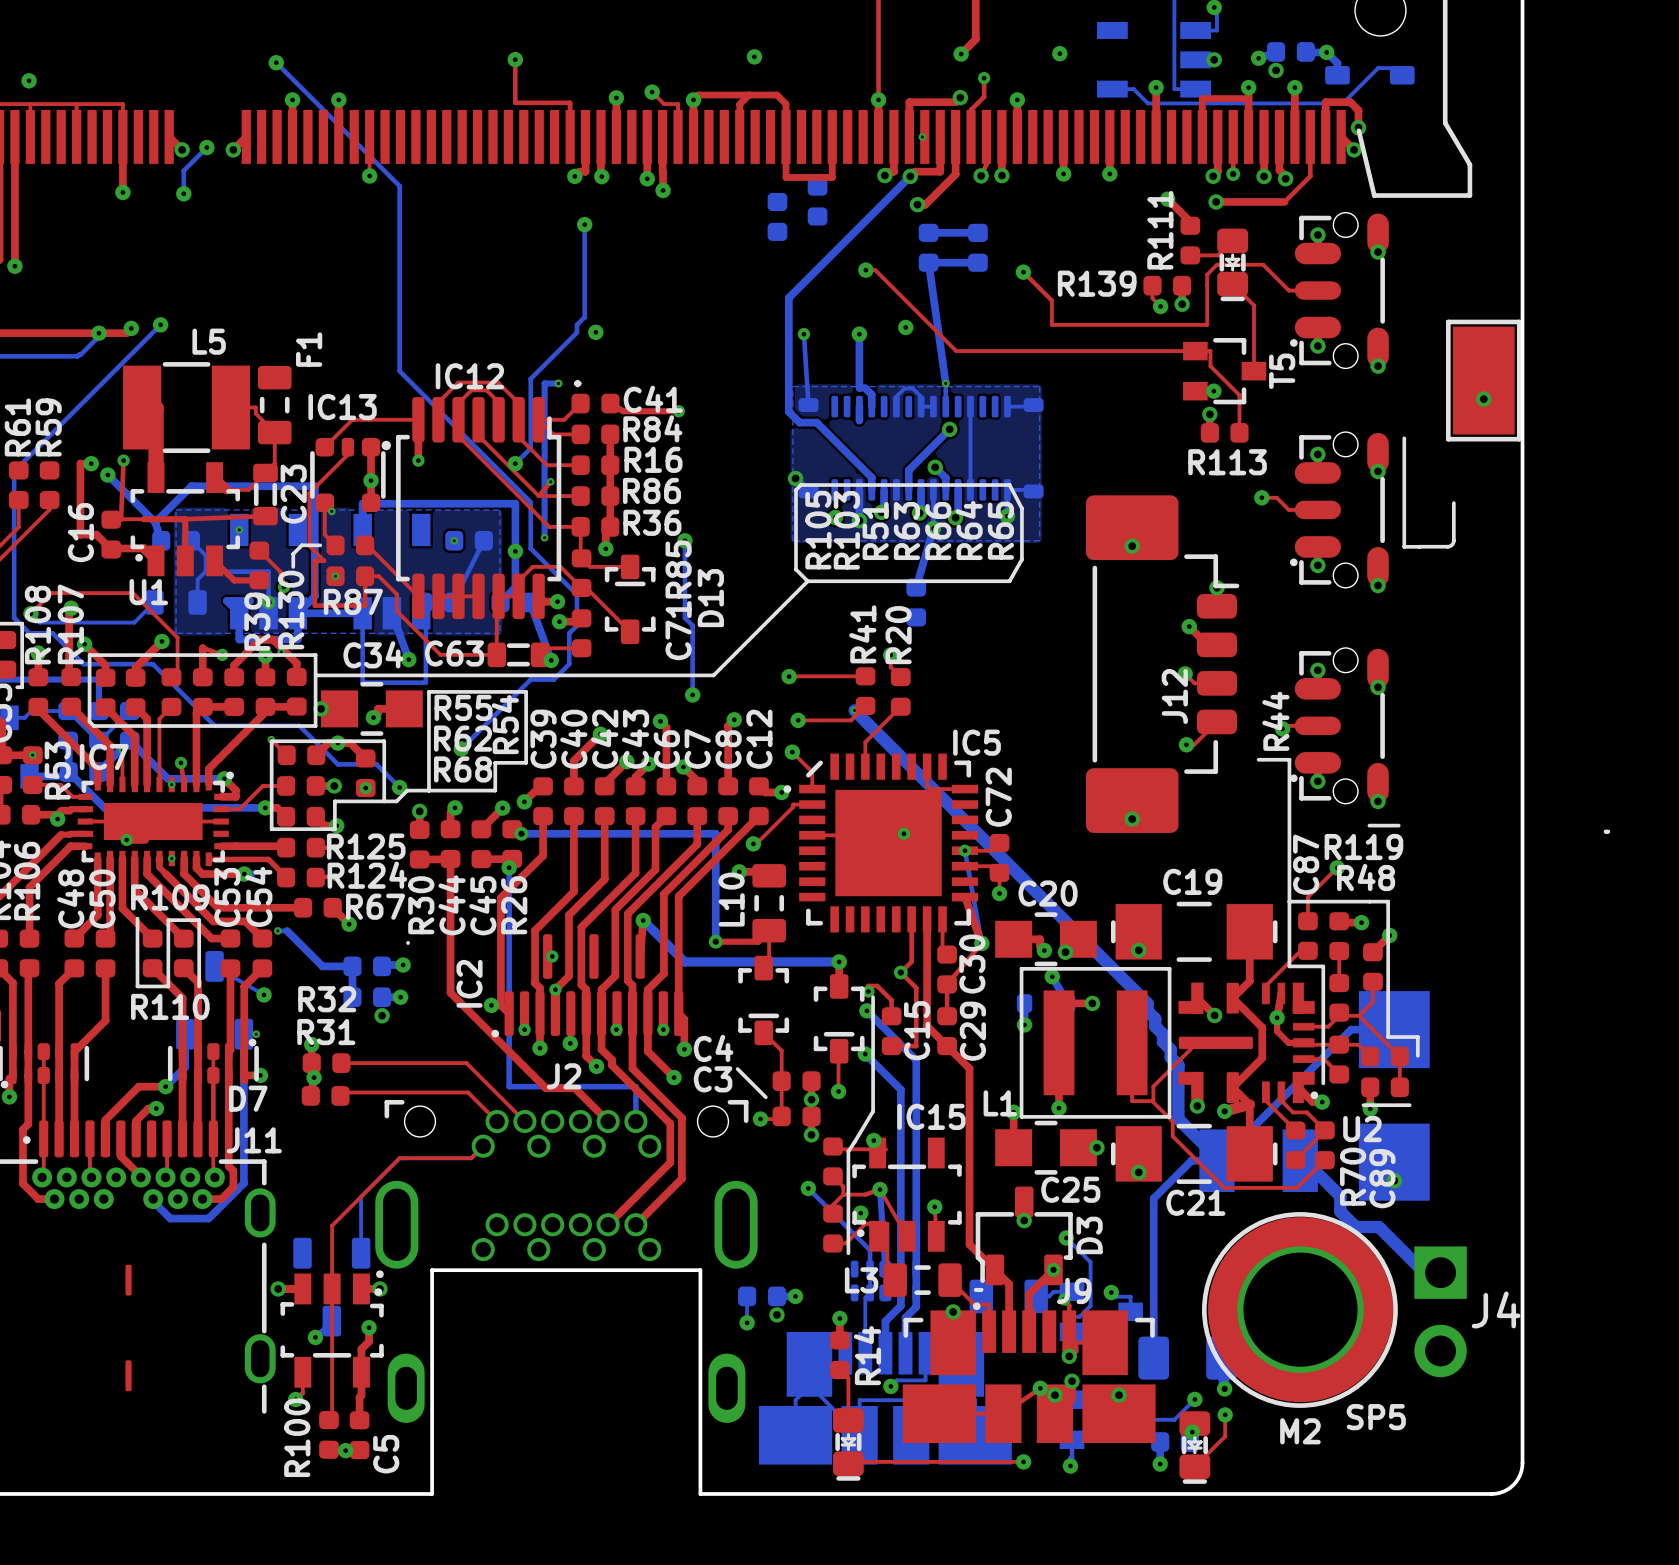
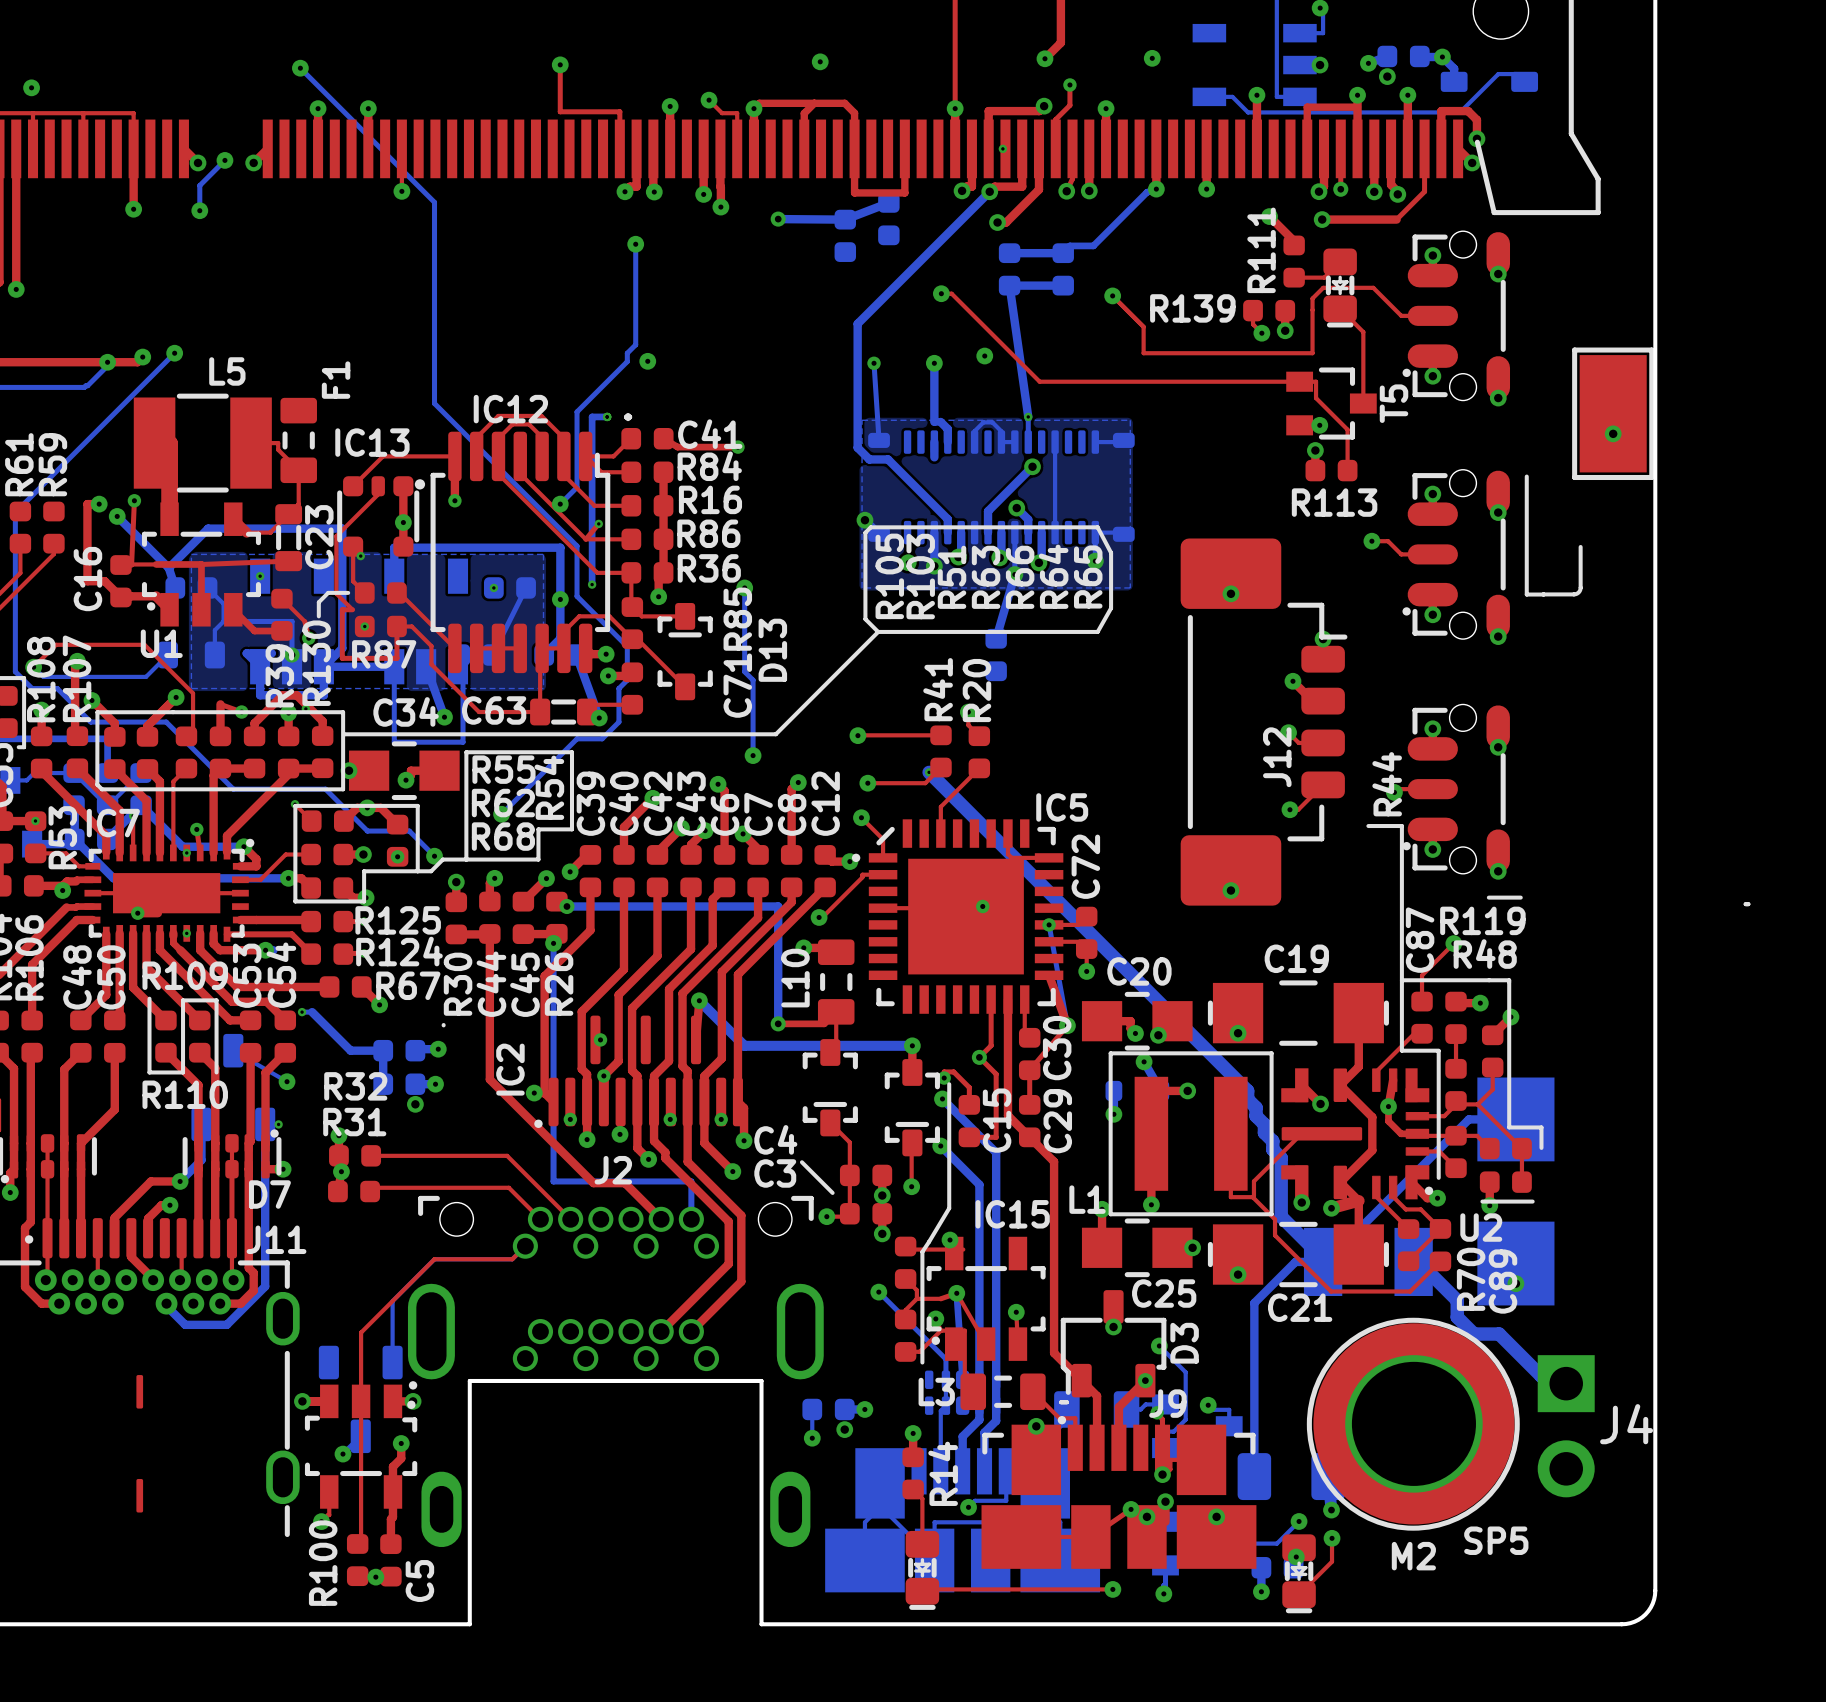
bottom track: none -> (1156, 189) (1147, 192) (1093, 245) (1069, 245) (1063, 252)
bottom track: none -> (888, 202) (845, 219) (778, 219)
via: none -> (778, 219)

